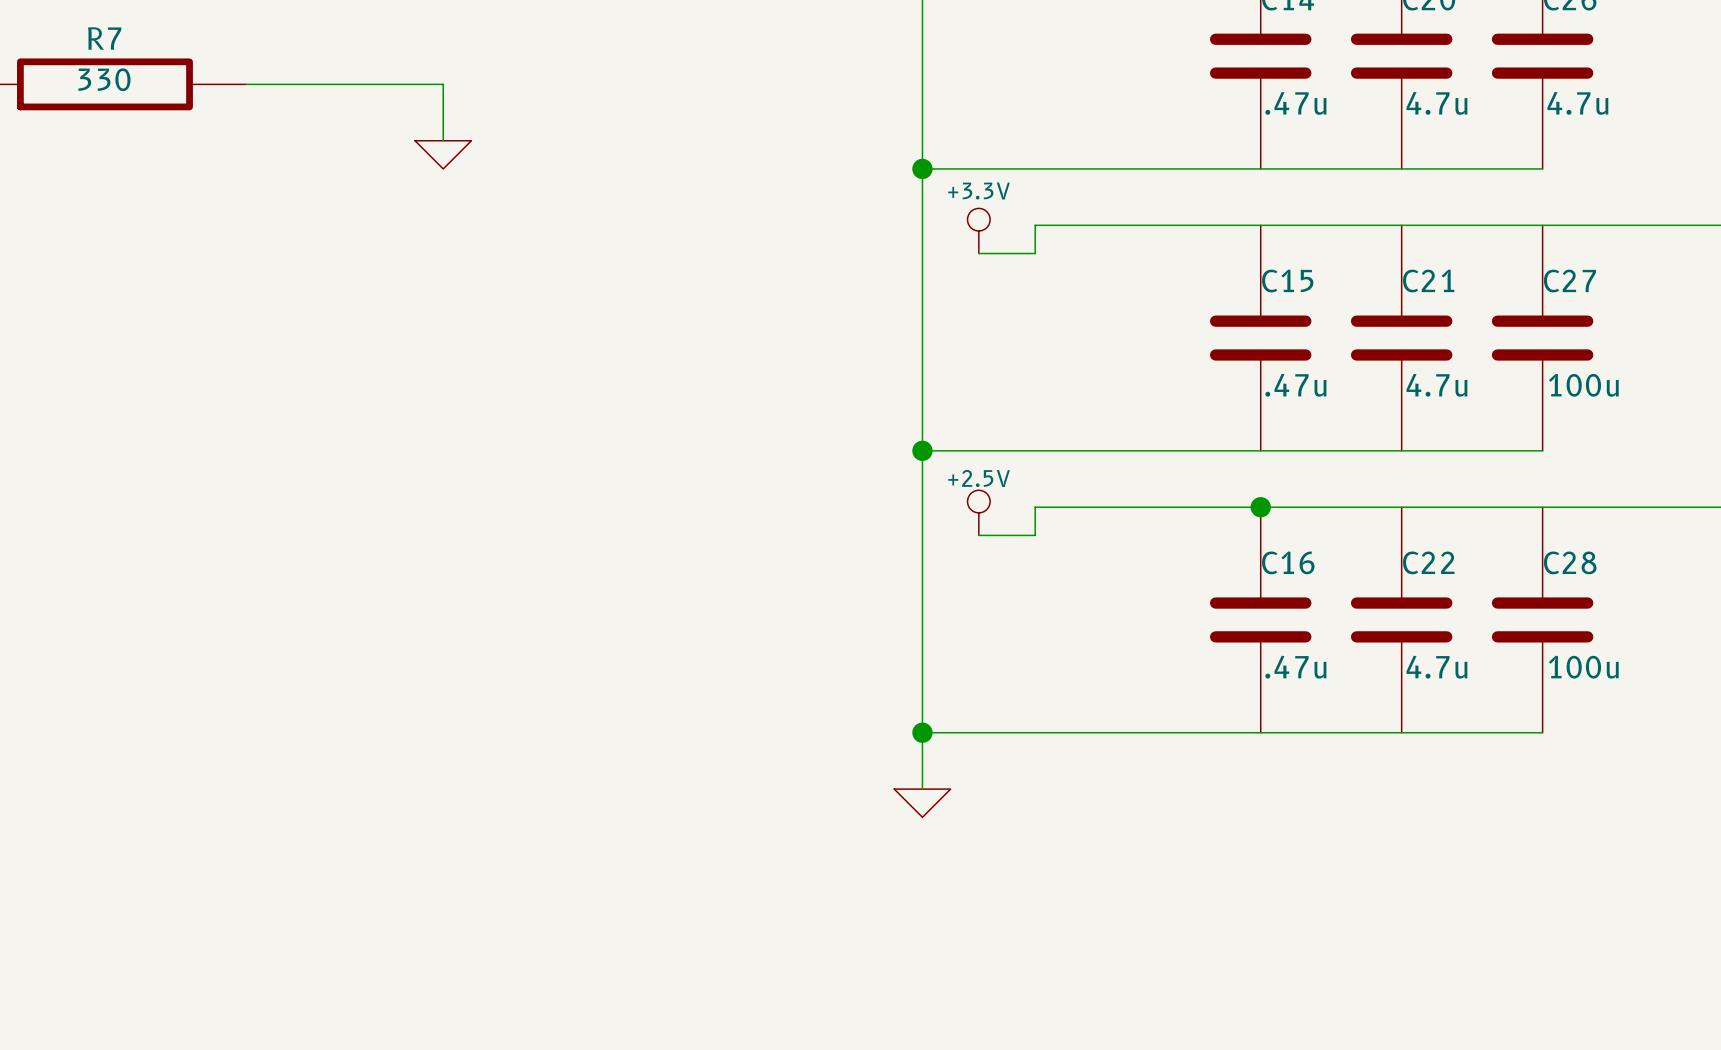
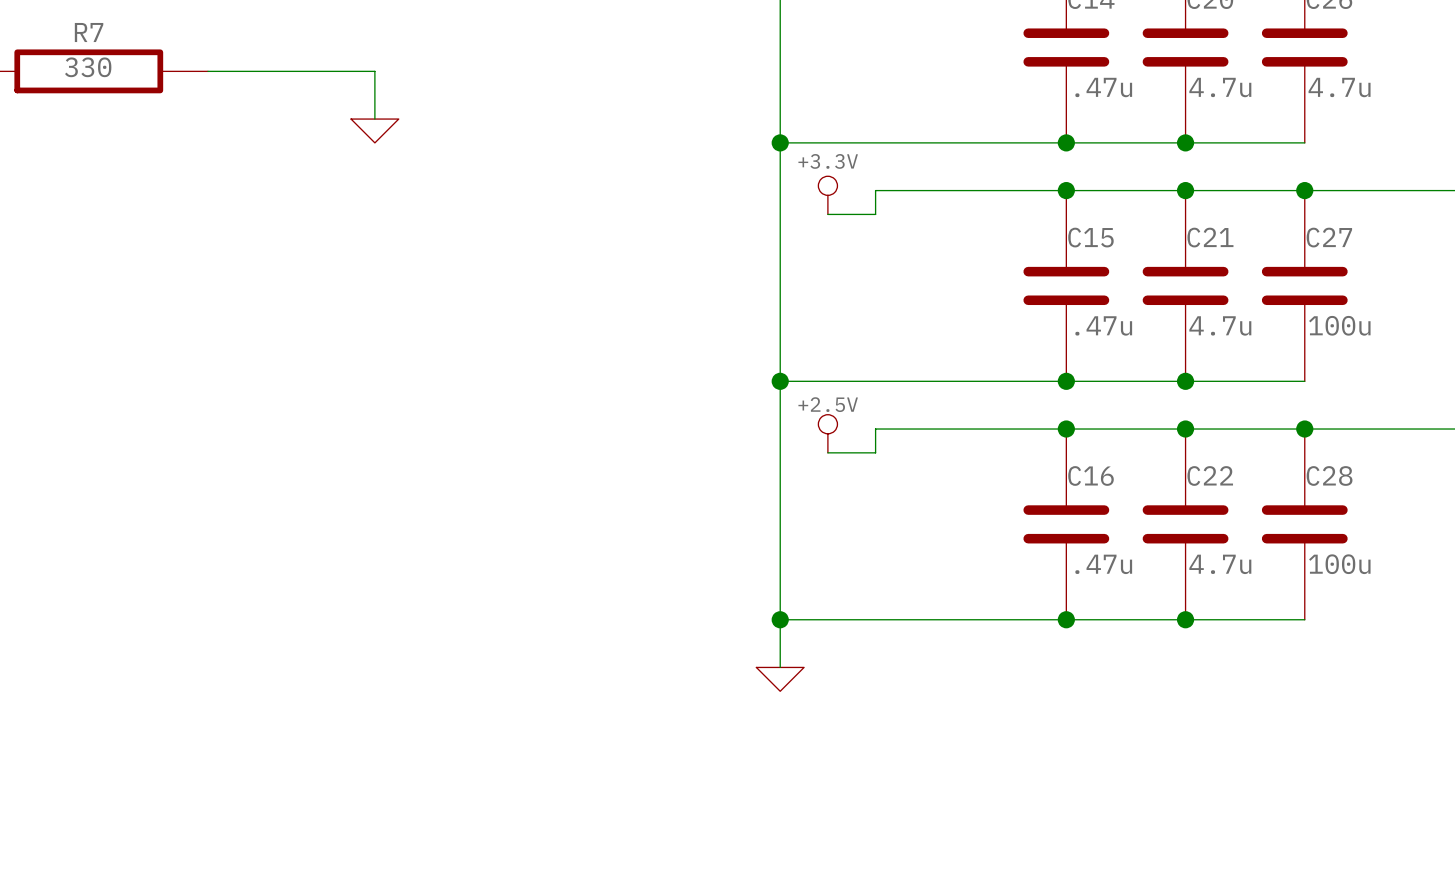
junction: none -> (1066, 142)
junction: none -> (1185, 142)
junction: none -> (1066, 190)
junction: none -> (1185, 190)
junction: none -> (1304, 190)
junction: none -> (1066, 381)
junction: none -> (1185, 381)
junction: none -> (1185, 429)
junction: none -> (1304, 429)
junction: none -> (1066, 619)
junction: none -> (1185, 619)

